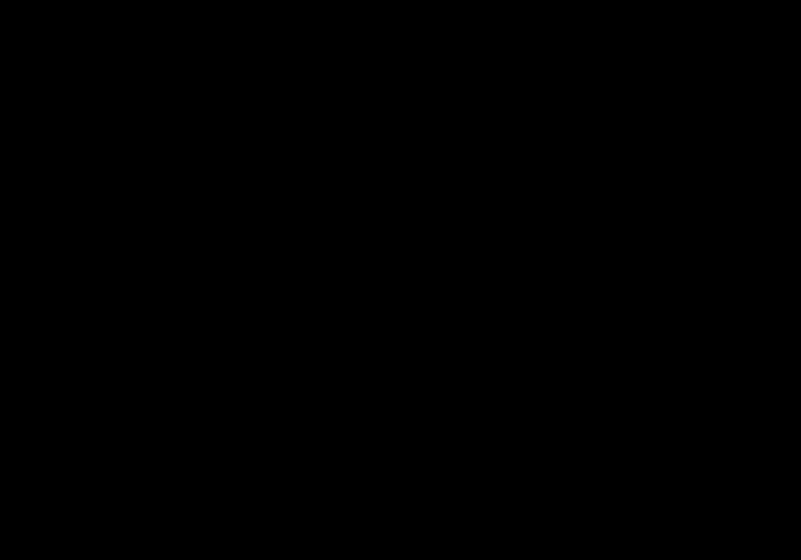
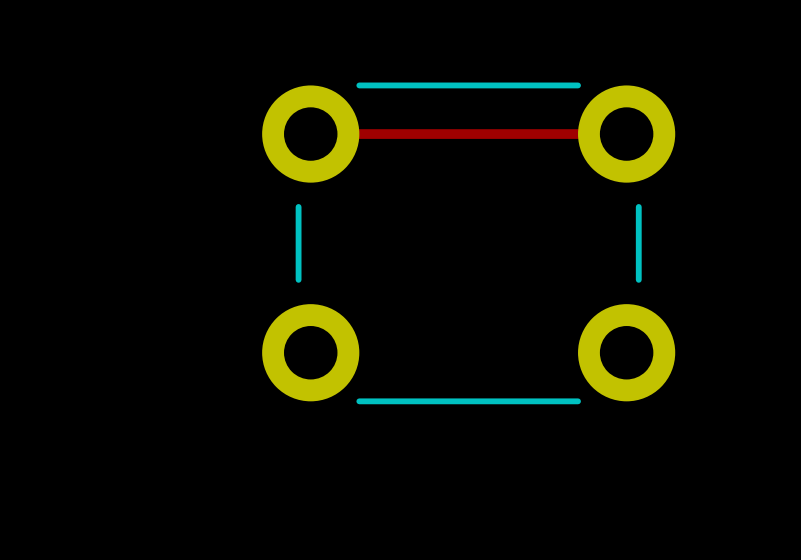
track: none -> (310, 134) (626, 134)
part: none -> (468, 243)

